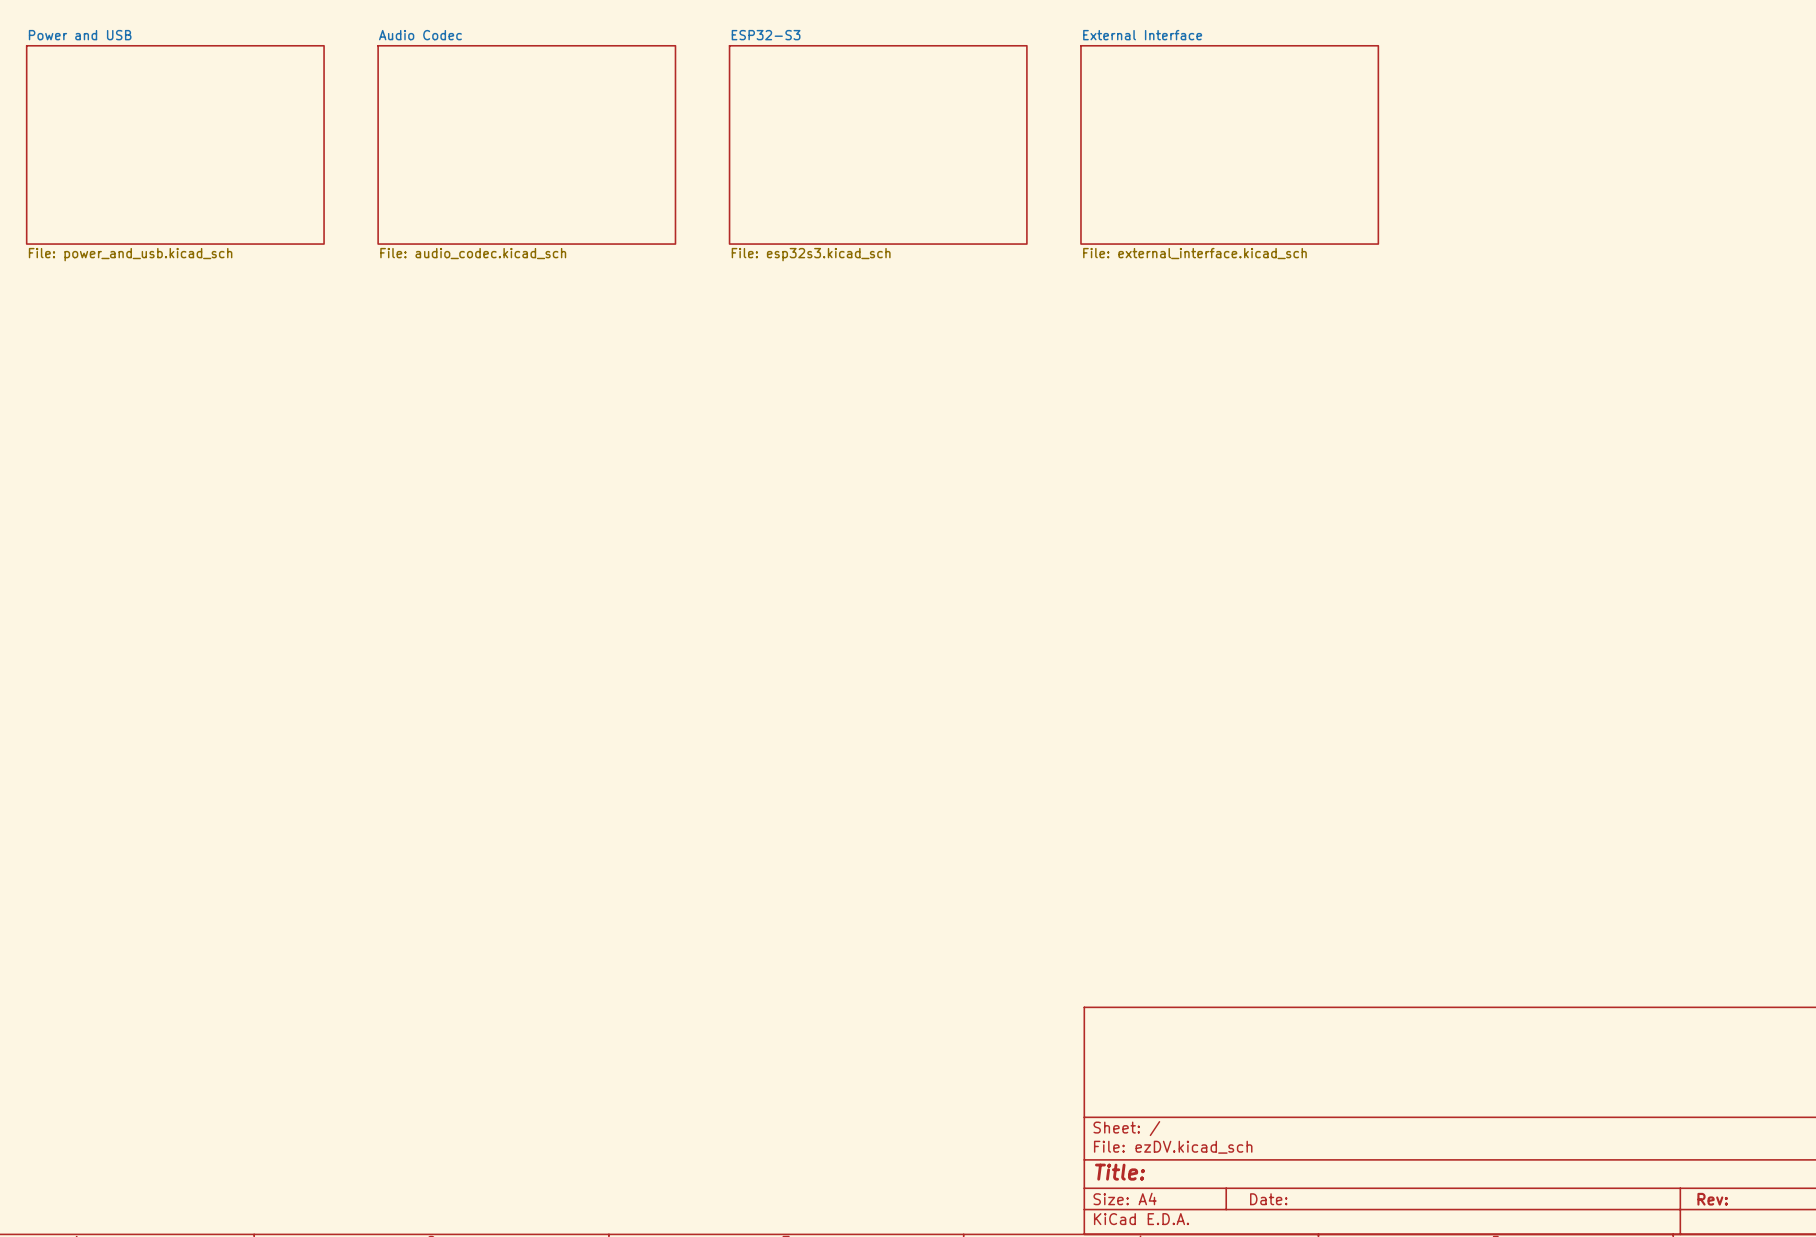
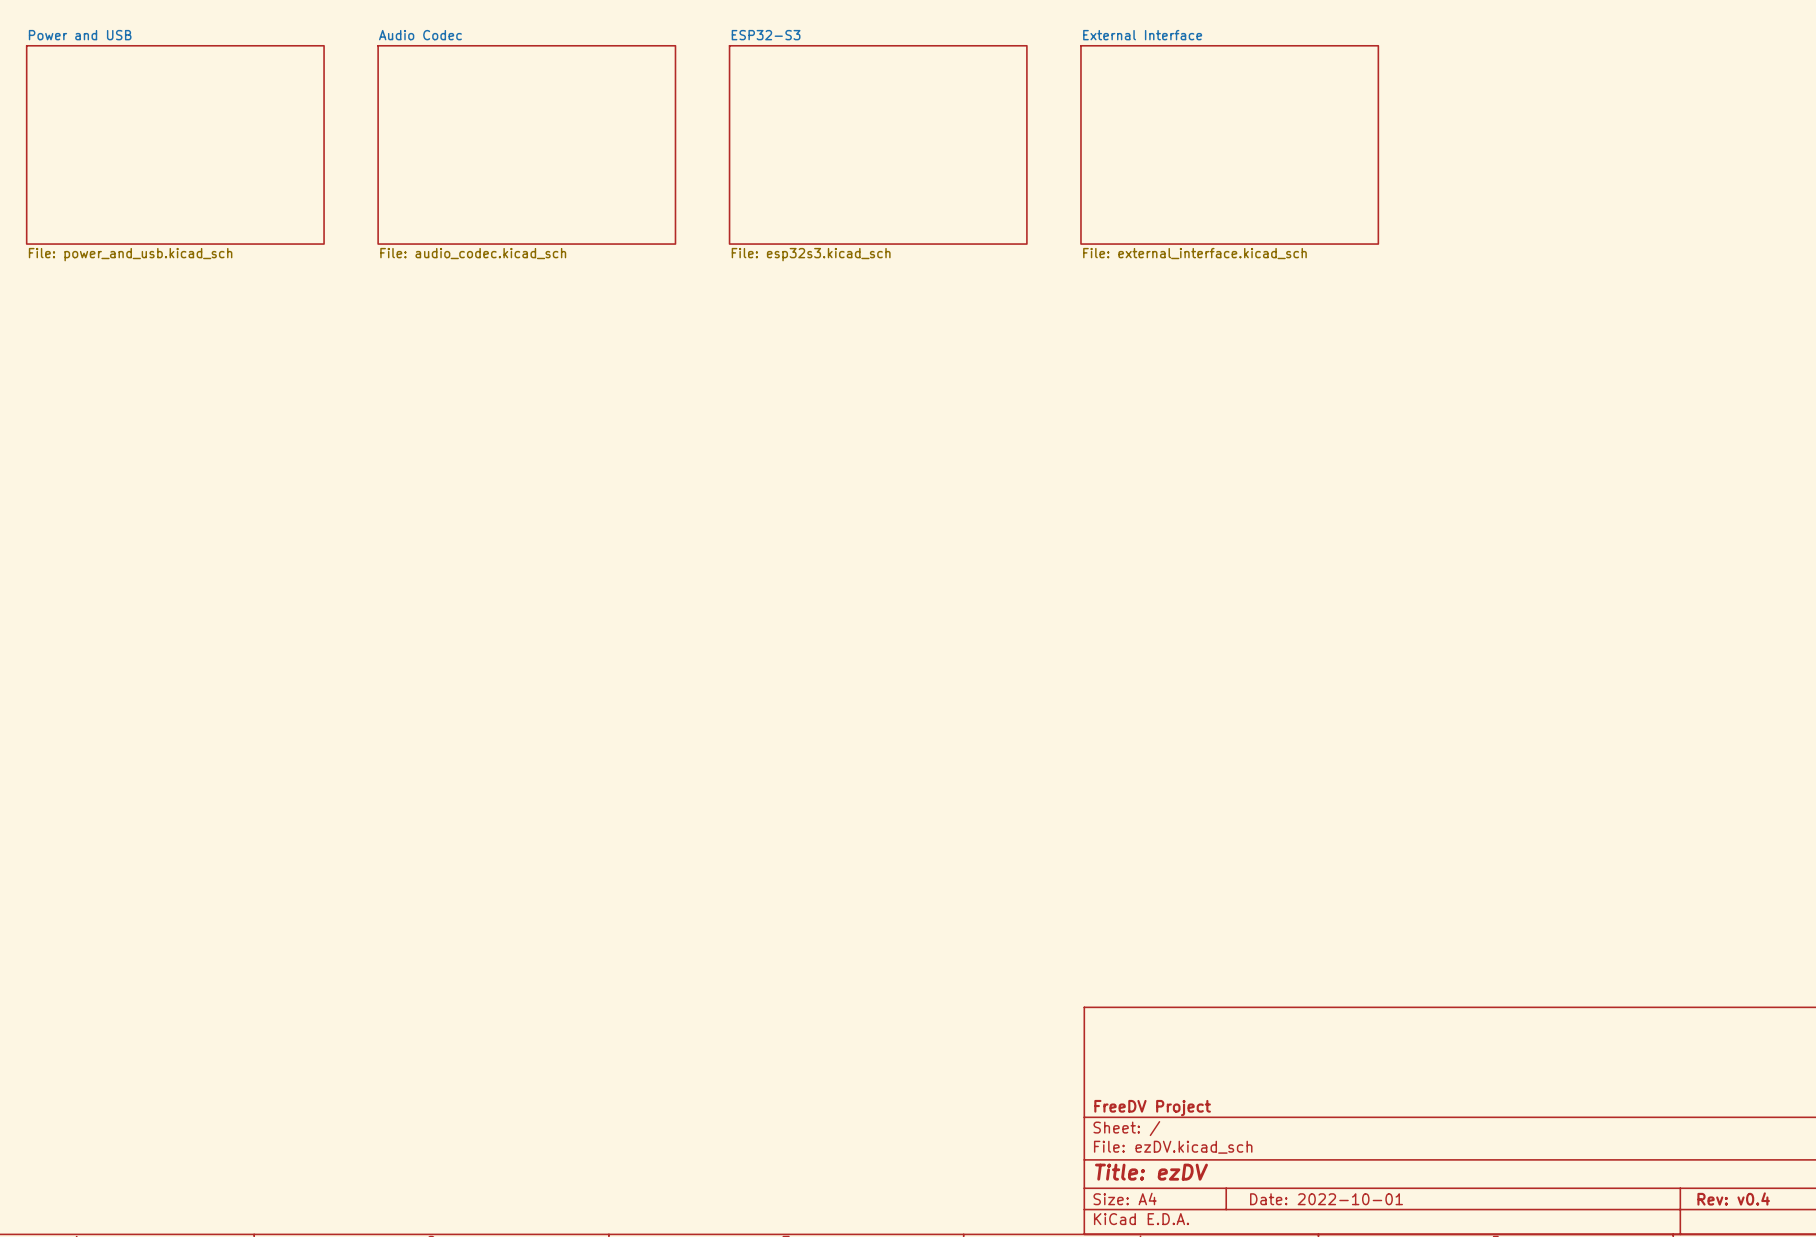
title block: none -> FreeDV Project (1152, 1108)
title block: Title: (1120, 1172) -> Title: ezDV (1151, 1172)
title block: Date: (1268, 1199) -> Date: 2022-10-01 (1326, 1199)
title block: Rev: (1712, 1199) -> Rev: v0.4 (1733, 1198)

